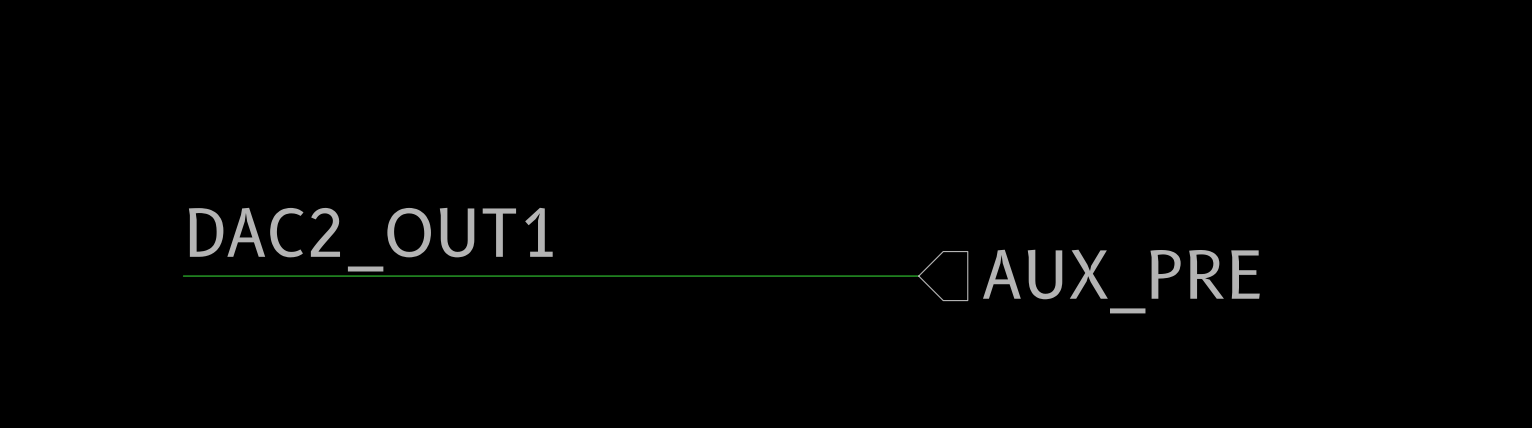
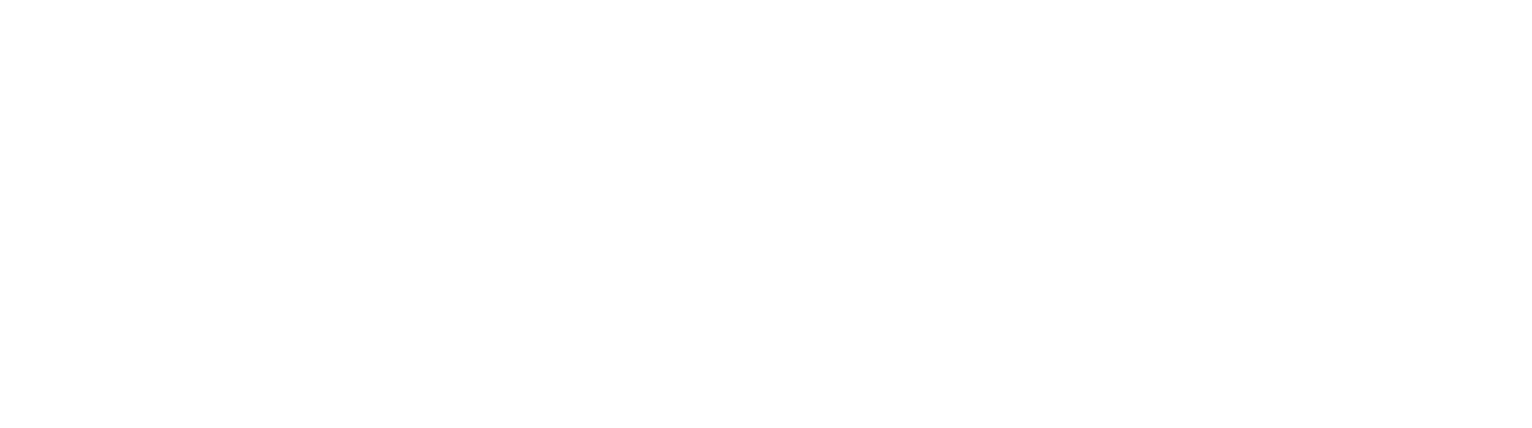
label: DAC2_OUT1 (370, 239) -> none
wire: (183, 276) (918, 276) -> none
hierarchical label: AUX_PRE (1121, 281) -> none

